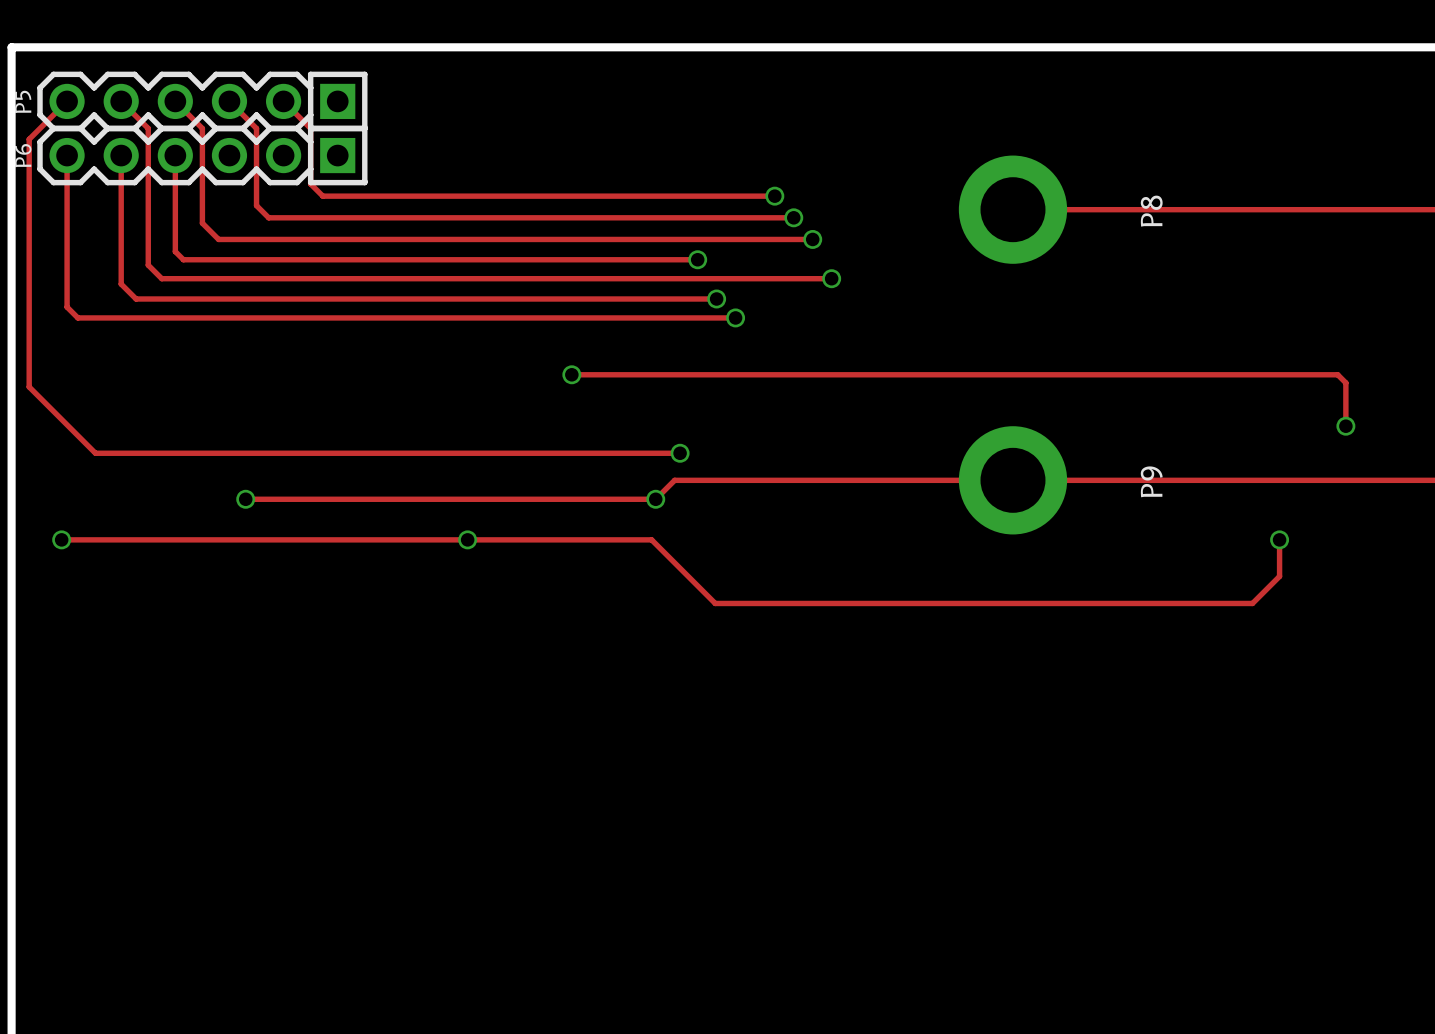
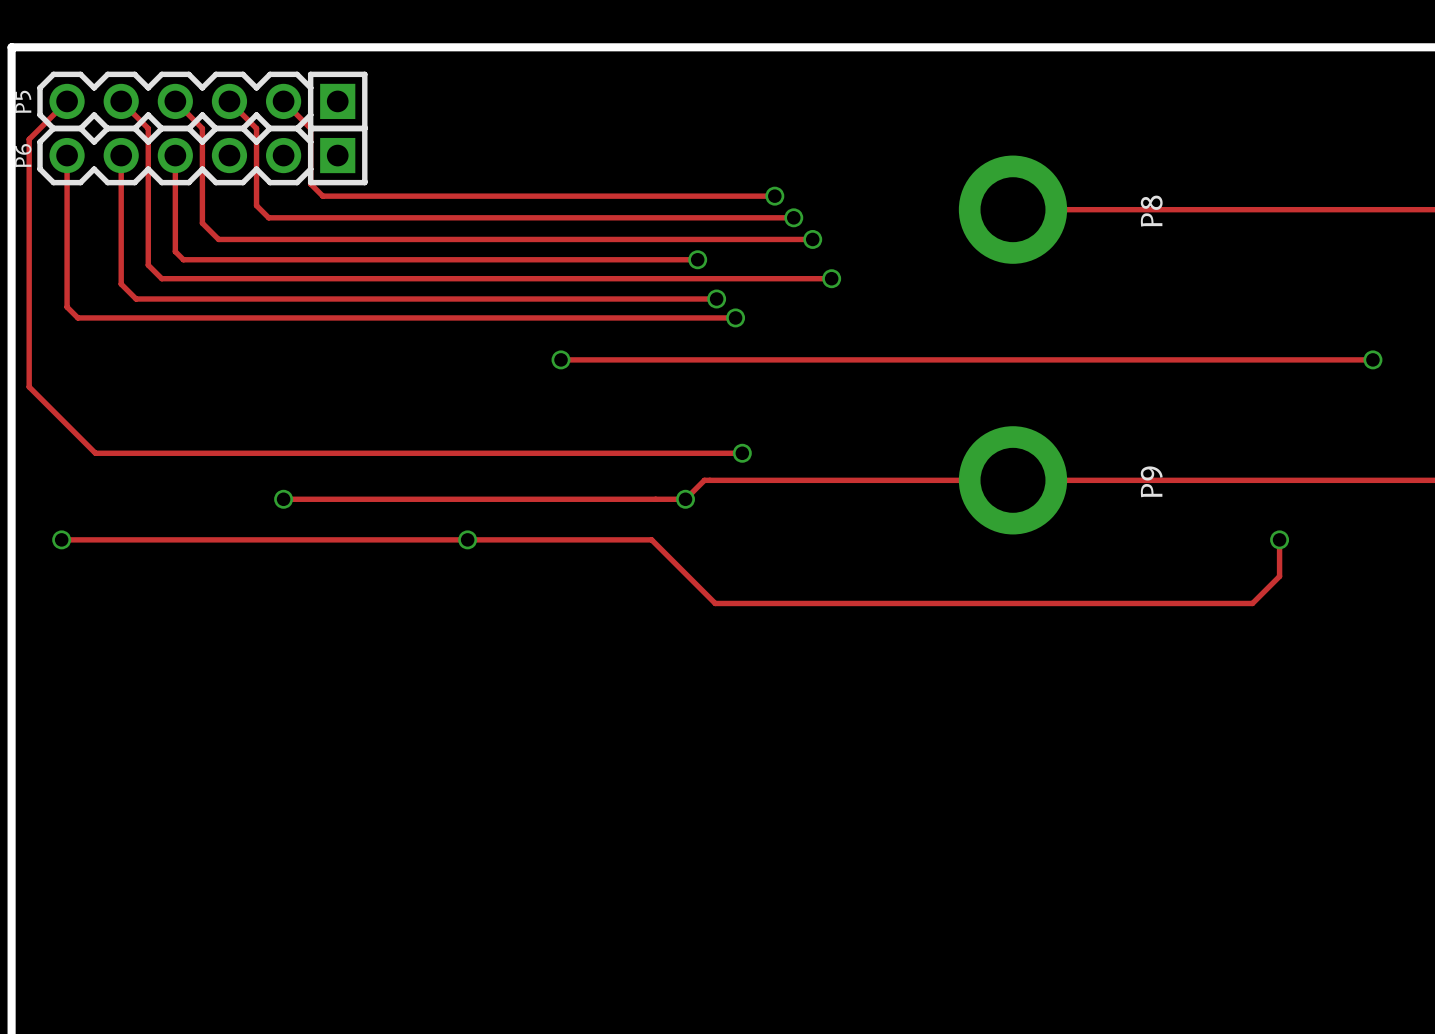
track: none -> (561, 359) (1372, 359)
track: (571, 374) (1337, 374) (1345, 382) (1345, 426) -> none
via position: (571, 374) -> (561, 359)
via position: (1345, 426) -> (1372, 359)
track: none -> (680, 453) (742, 453)
via: (680, 453) -> none
via: none -> (742, 453)
track: (704, 480) (674, 480) (655, 499) -> (704, 480) (685, 499) (655, 499)
track: (245, 499) (283, 499) -> none
via position: (245, 499) -> (283, 499)
via: (655, 499) -> none
via: none -> (685, 499)

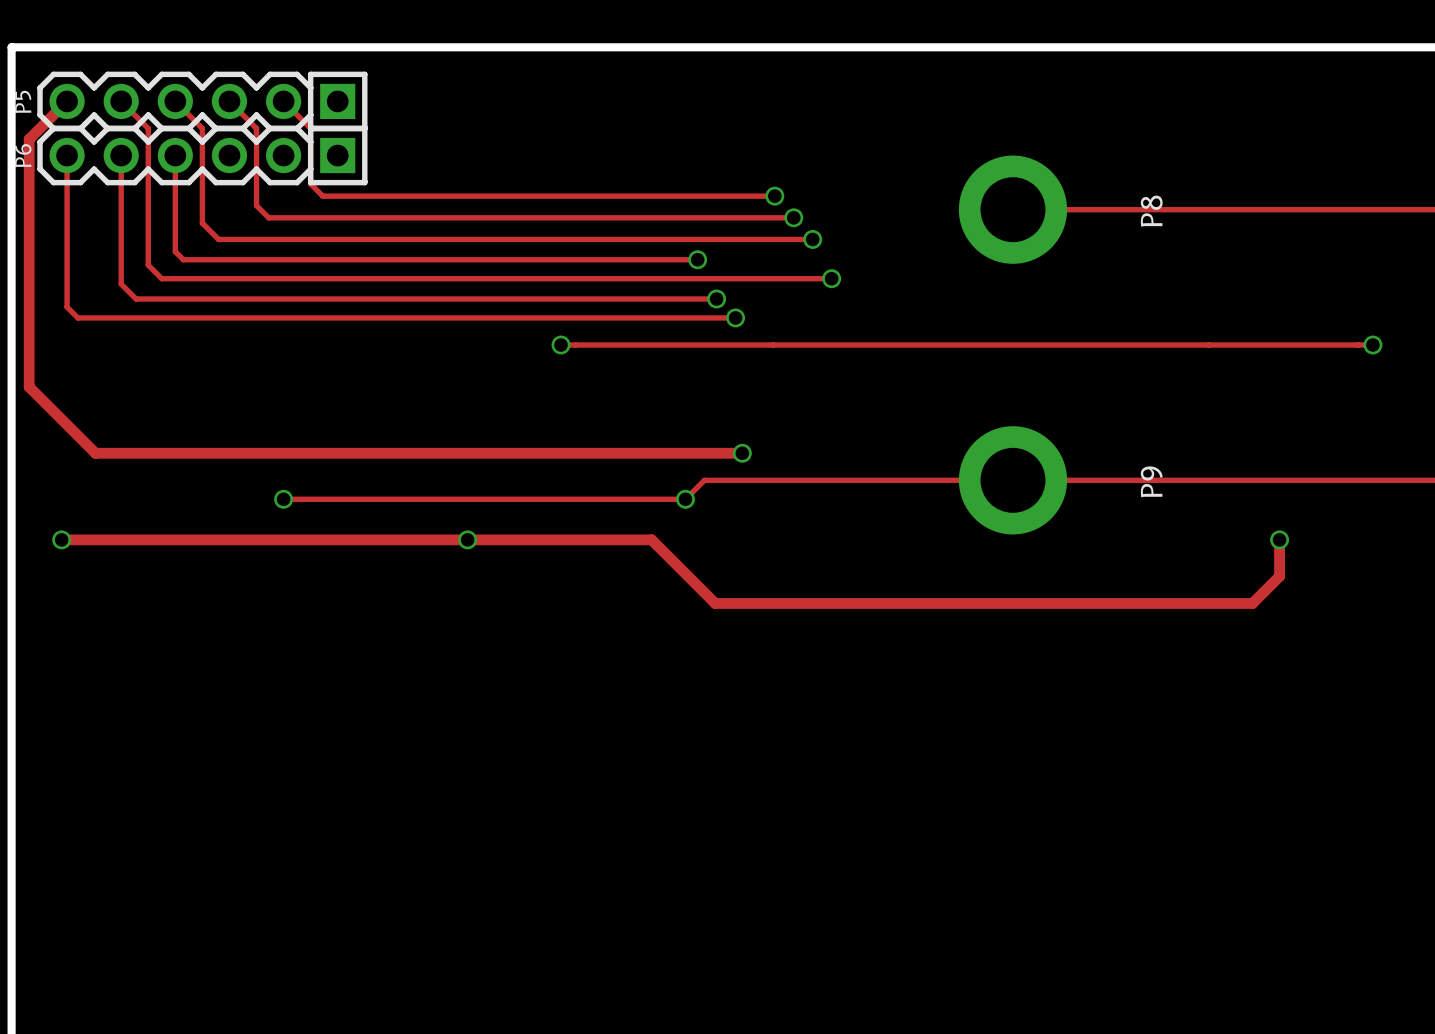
track width: thin (67, 101) (29, 139) (29, 386) (95, 453) (742, 453) -> thick (67, 101) (29, 139) (29, 386) (95, 453) (742, 453)
track: (561, 359) (1372, 359) -> (561, 345) (1372, 345)
via position: (561, 359) -> (561, 345)
via position: (1372, 359) -> (1372, 345)
track width: thin (61, 539) (651, 539) (715, 603) (1252, 603) (1279, 576) (1279, 539) -> thick (61, 539) (651, 539) (715, 603) (1252, 603) (1279, 576) (1279, 539)

